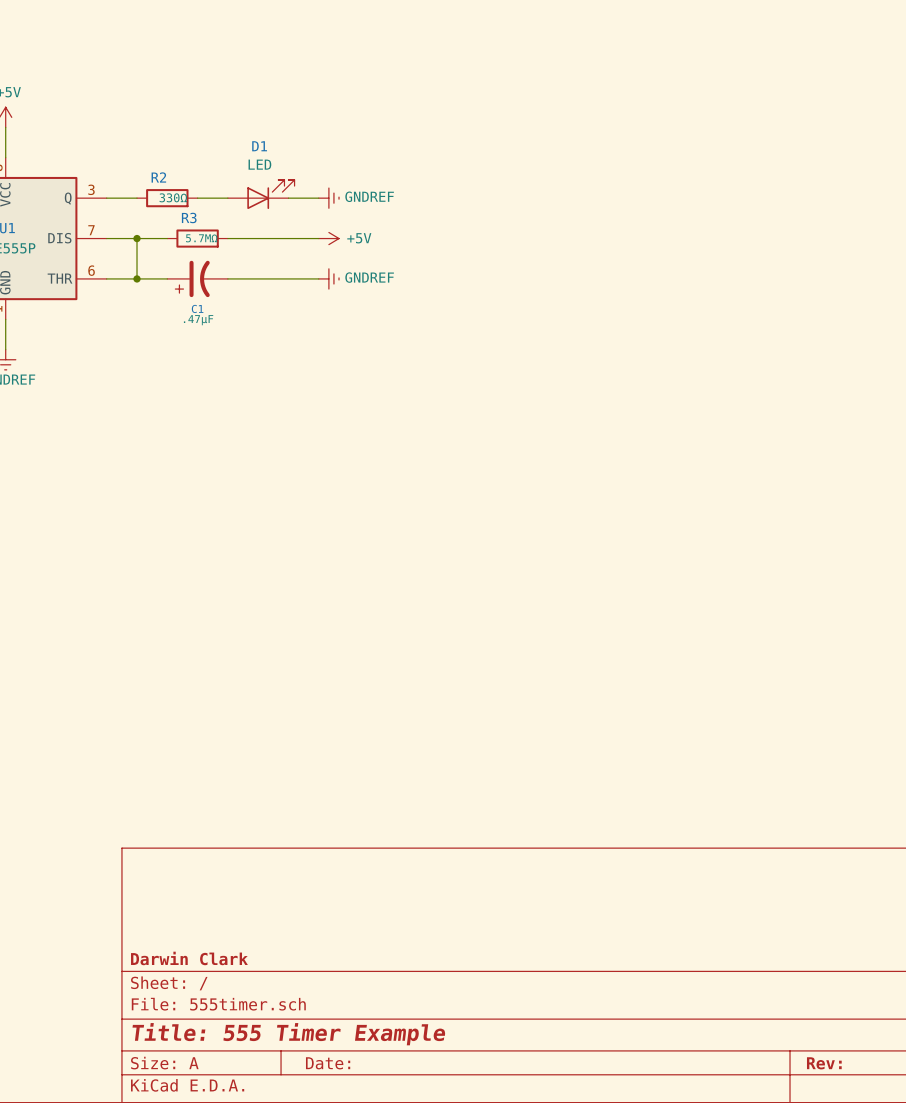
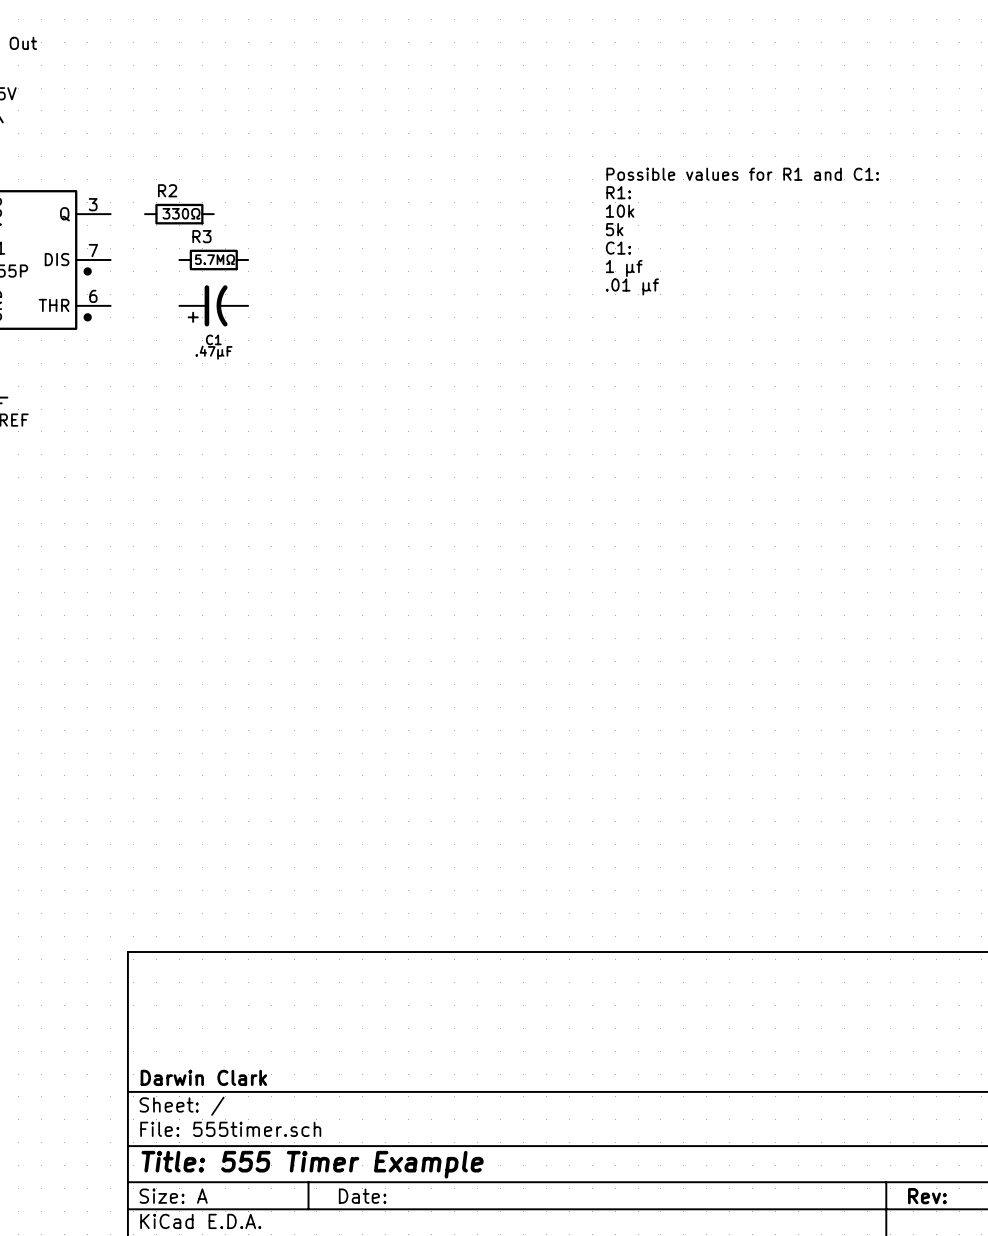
label: none -> Out (23, 43)
text: none -> Possible values for R1 and C1: (742, 174)
text: none -> R1: (618, 192)
D1: LED (261, 194) -> none
text: none -> 10k (620, 211)
wire: (106, 198) (137, 198) -> none
wire: (197, 198) (227, 198) -> none
wire: (288, 198) (318, 198) -> none
power symbol: GNDREF (328, 198) -> none
text: none -> 5k (614, 229)
text: none -> C1: (618, 248)
wire: (106, 238) (167, 238) -> none
wire: (137, 238) (137, 278) -> none
junction: (137, 238) -> none
wire: (227, 238) (318, 238) -> none
power symbol: +5V (328, 238) -> none
text: none -> 1 μf (624, 268)
junction: none -> (87, 271)
text: none -> .01 μf (632, 286)
wire: (106, 278) (167, 278) -> none
junction: (137, 278) -> none
wire: (227, 278) (318, 278) -> none
power symbol: GNDREF (328, 278) -> none
junction: none -> (87, 317)

